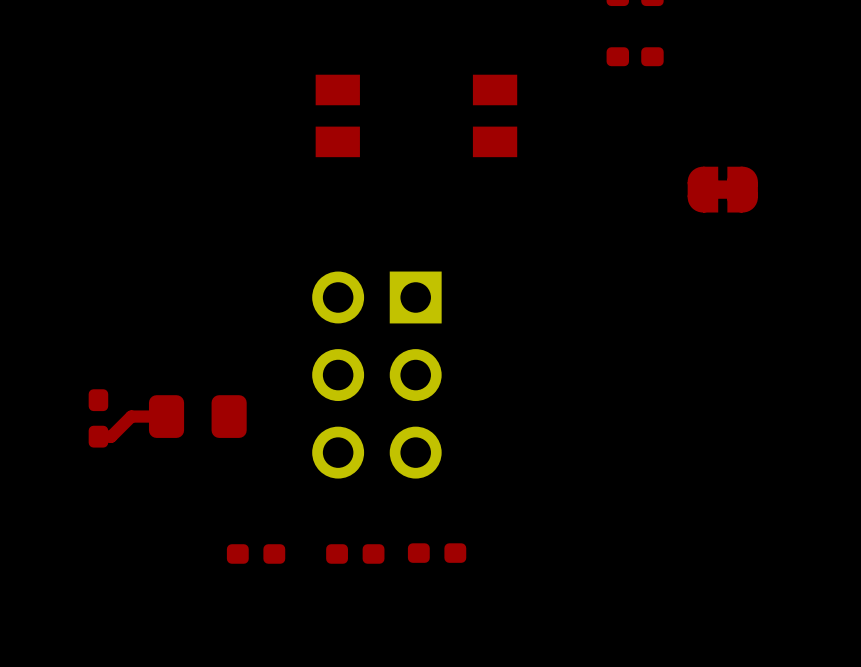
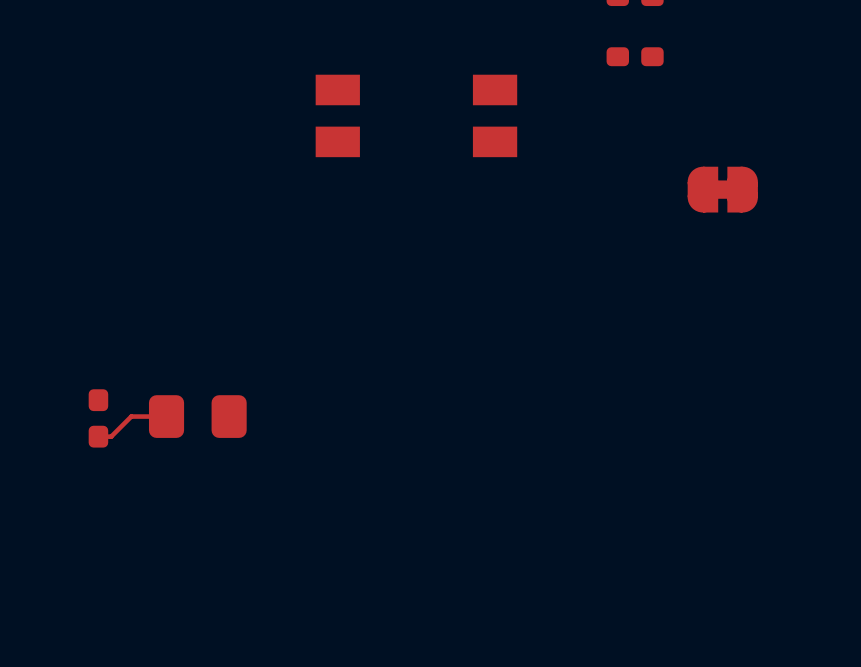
part: (376, 375) -> none
top track width: thick (166, 416) (131, 416) (111, 436) (98, 436) -> thin (166, 416) (131, 416) (111, 436) (98, 436)
part: (256, 553) -> none
part: (355, 553) -> none
part: (437, 553) -> none

